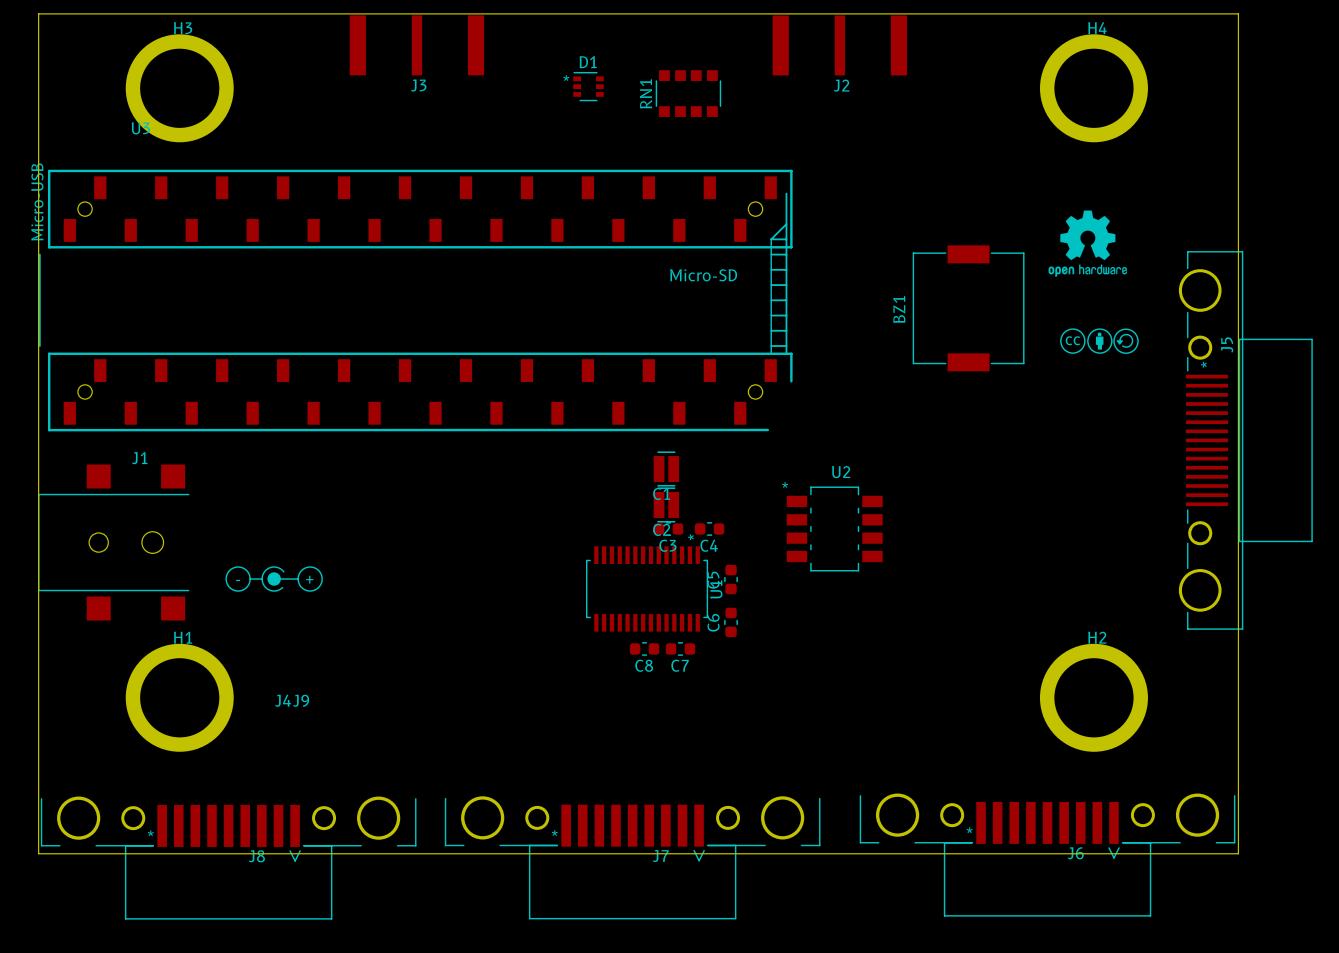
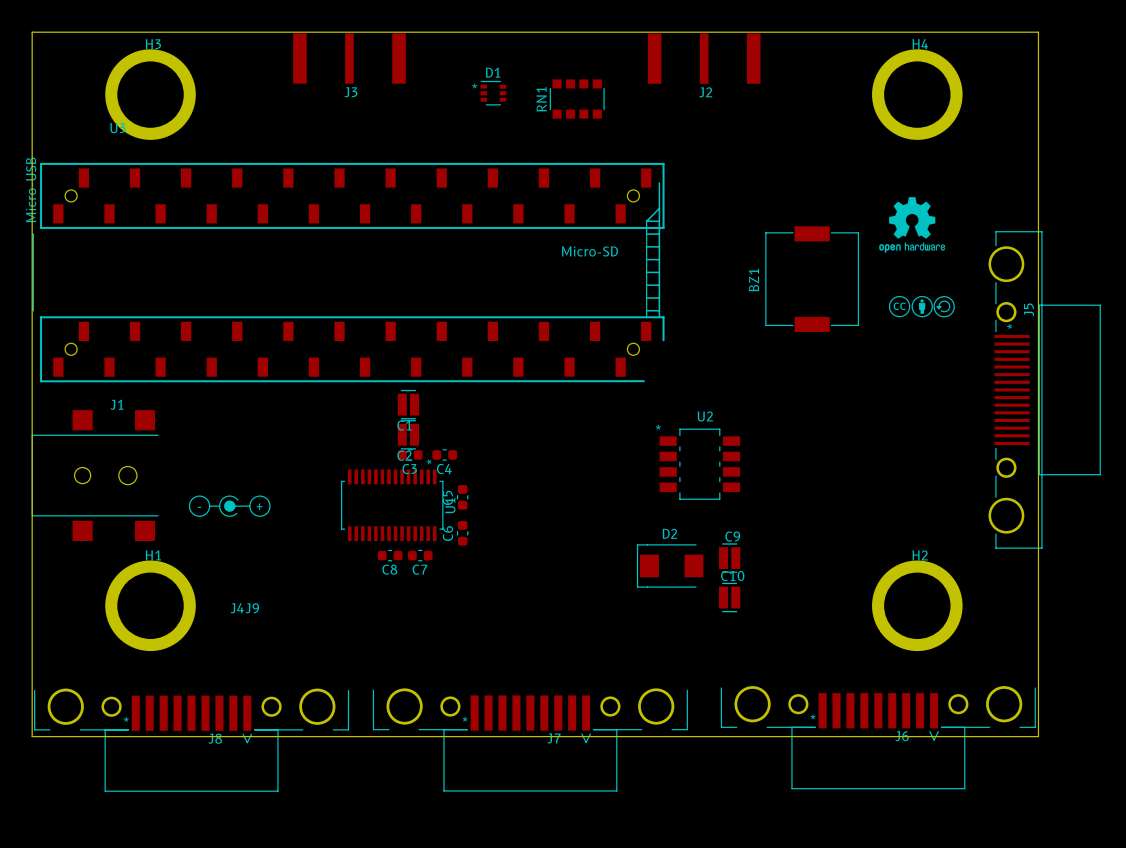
C1 position: (666, 468) -> (408, 404)
C2 position: (666, 504) -> (408, 434)
C3 position: (668, 528) -> (410, 454)
C4 position: (709, 528) -> (444, 454)
C5 position: (731, 579) -> (462, 497)
U1 position: (647, 588) -> (392, 505)
C6 position: (731, 622) -> (462, 533)
C9: none -> (729, 558)
C8 position: (644, 648) -> (390, 555)
C7 position: (680, 648) -> (420, 555)
D2: none -> (670, 566)
C10: none -> (729, 597)

